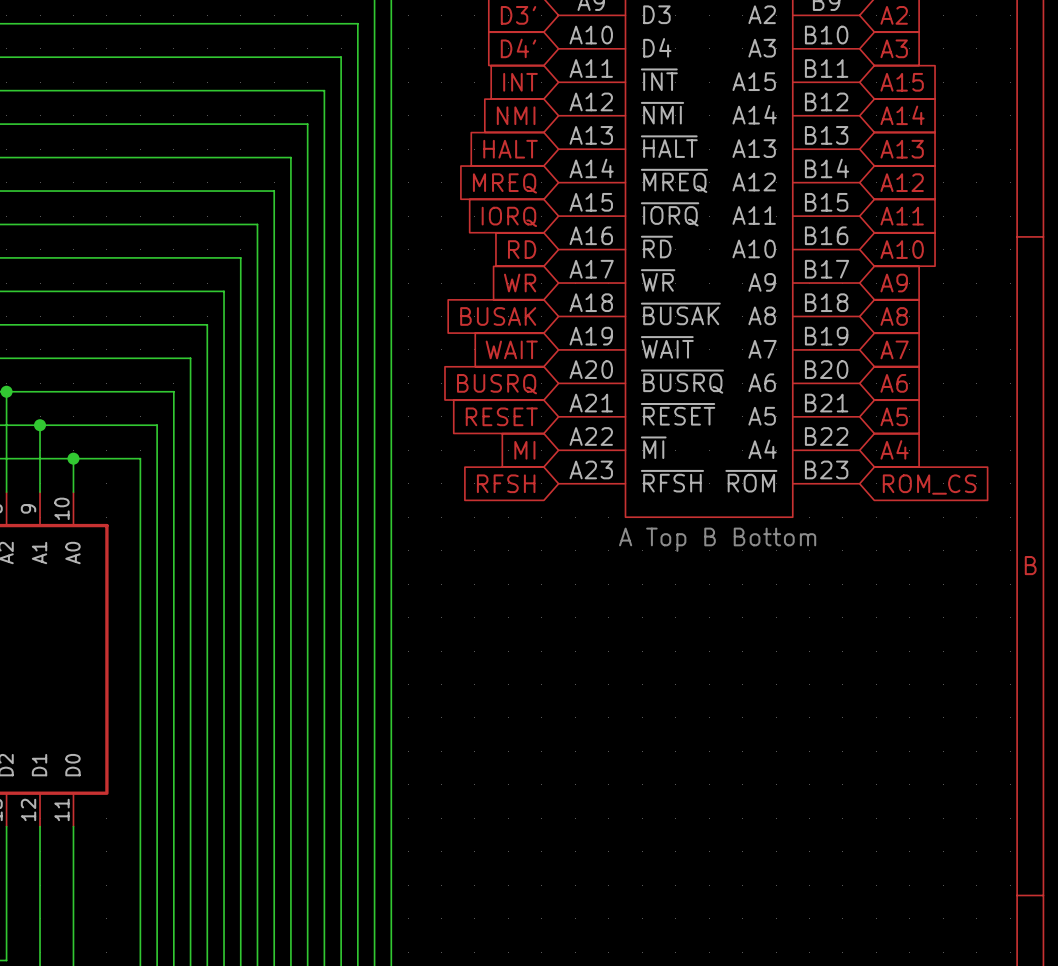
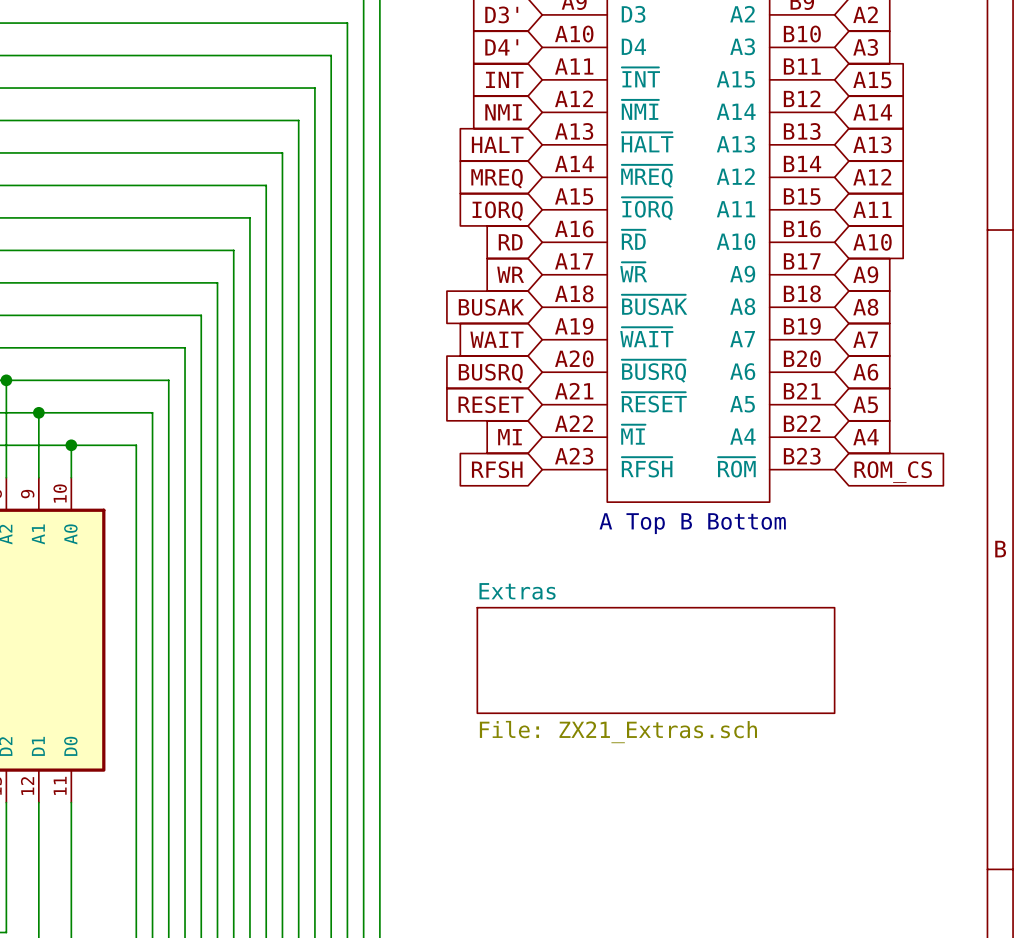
sheet Extras: none -> File: ZX21_Extras.sch (655, 660)

